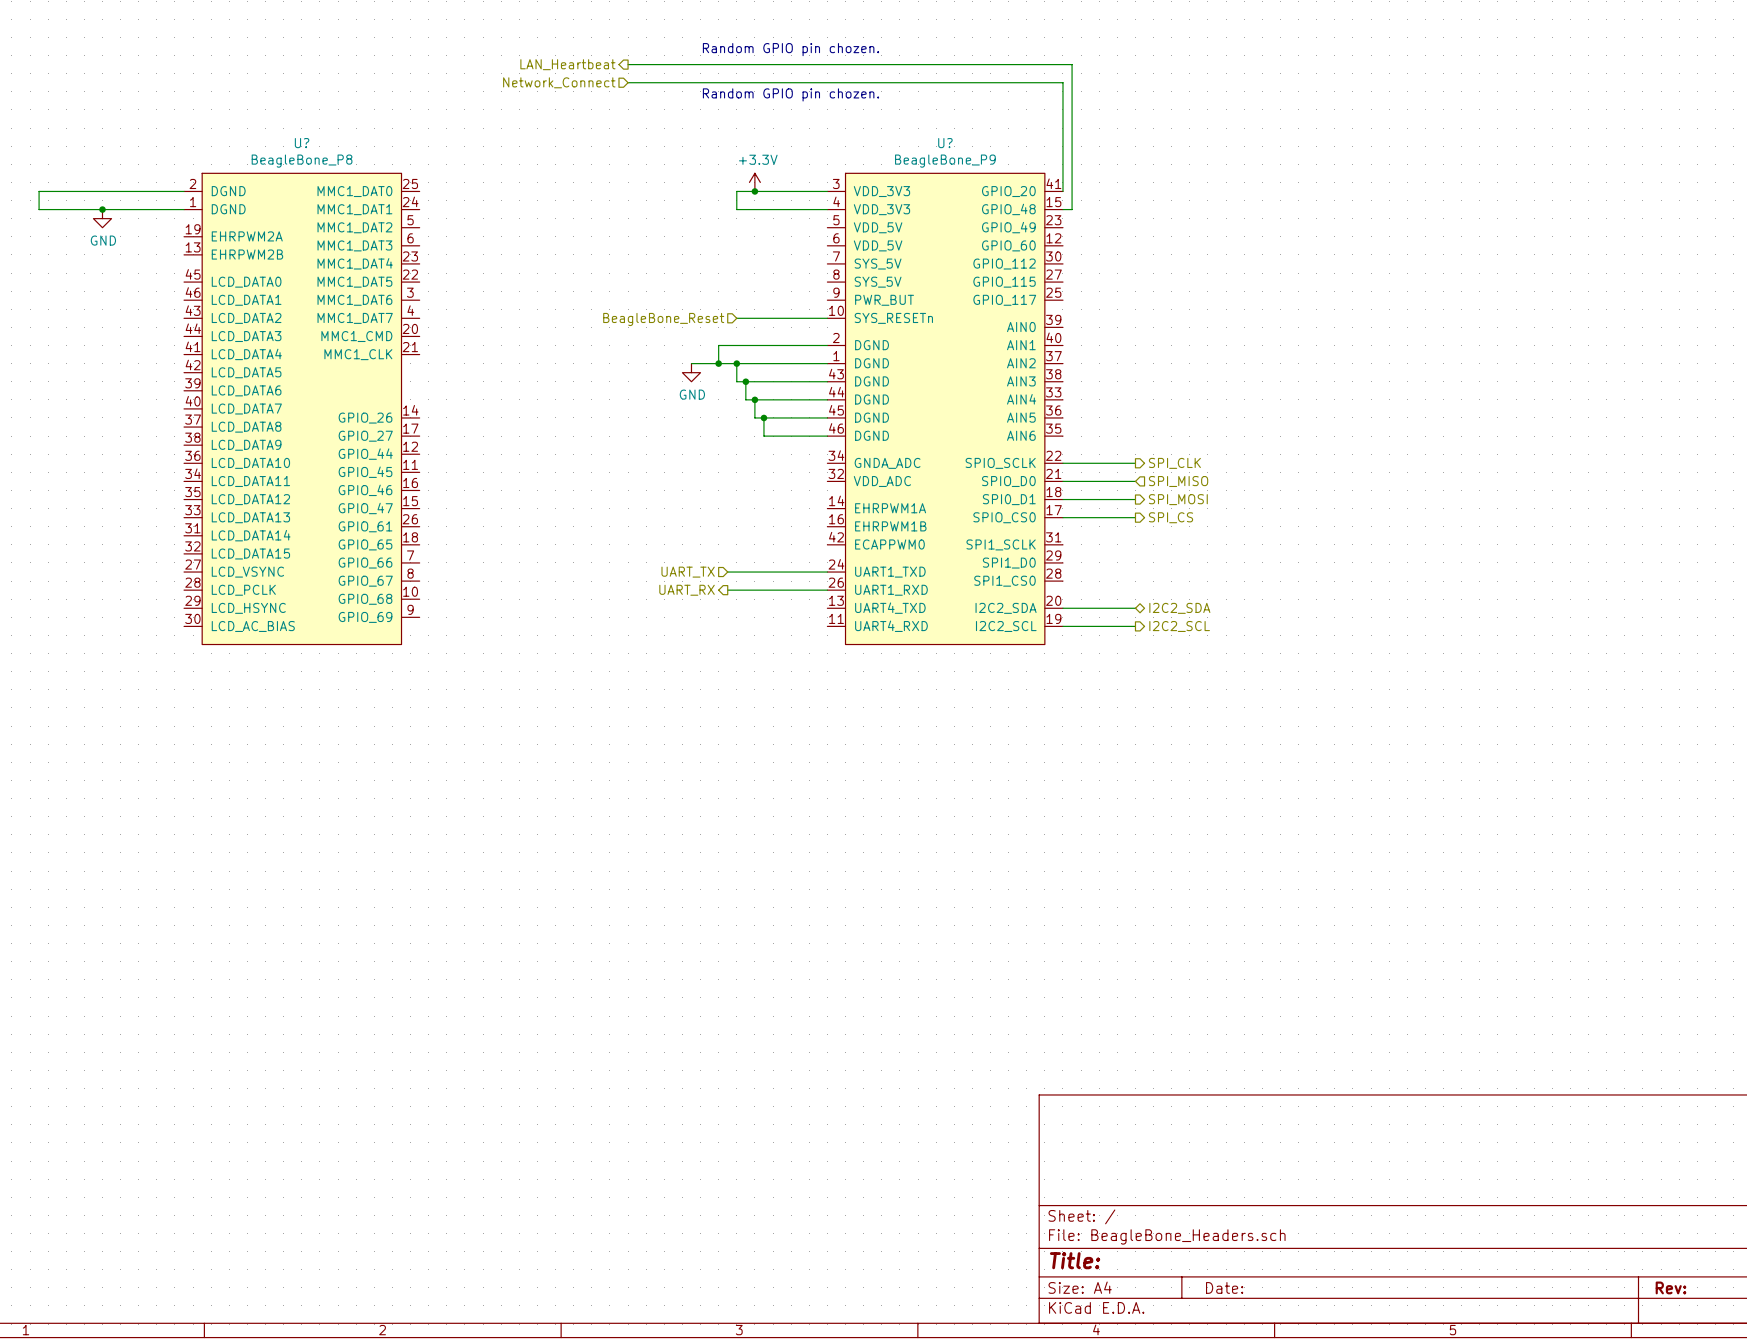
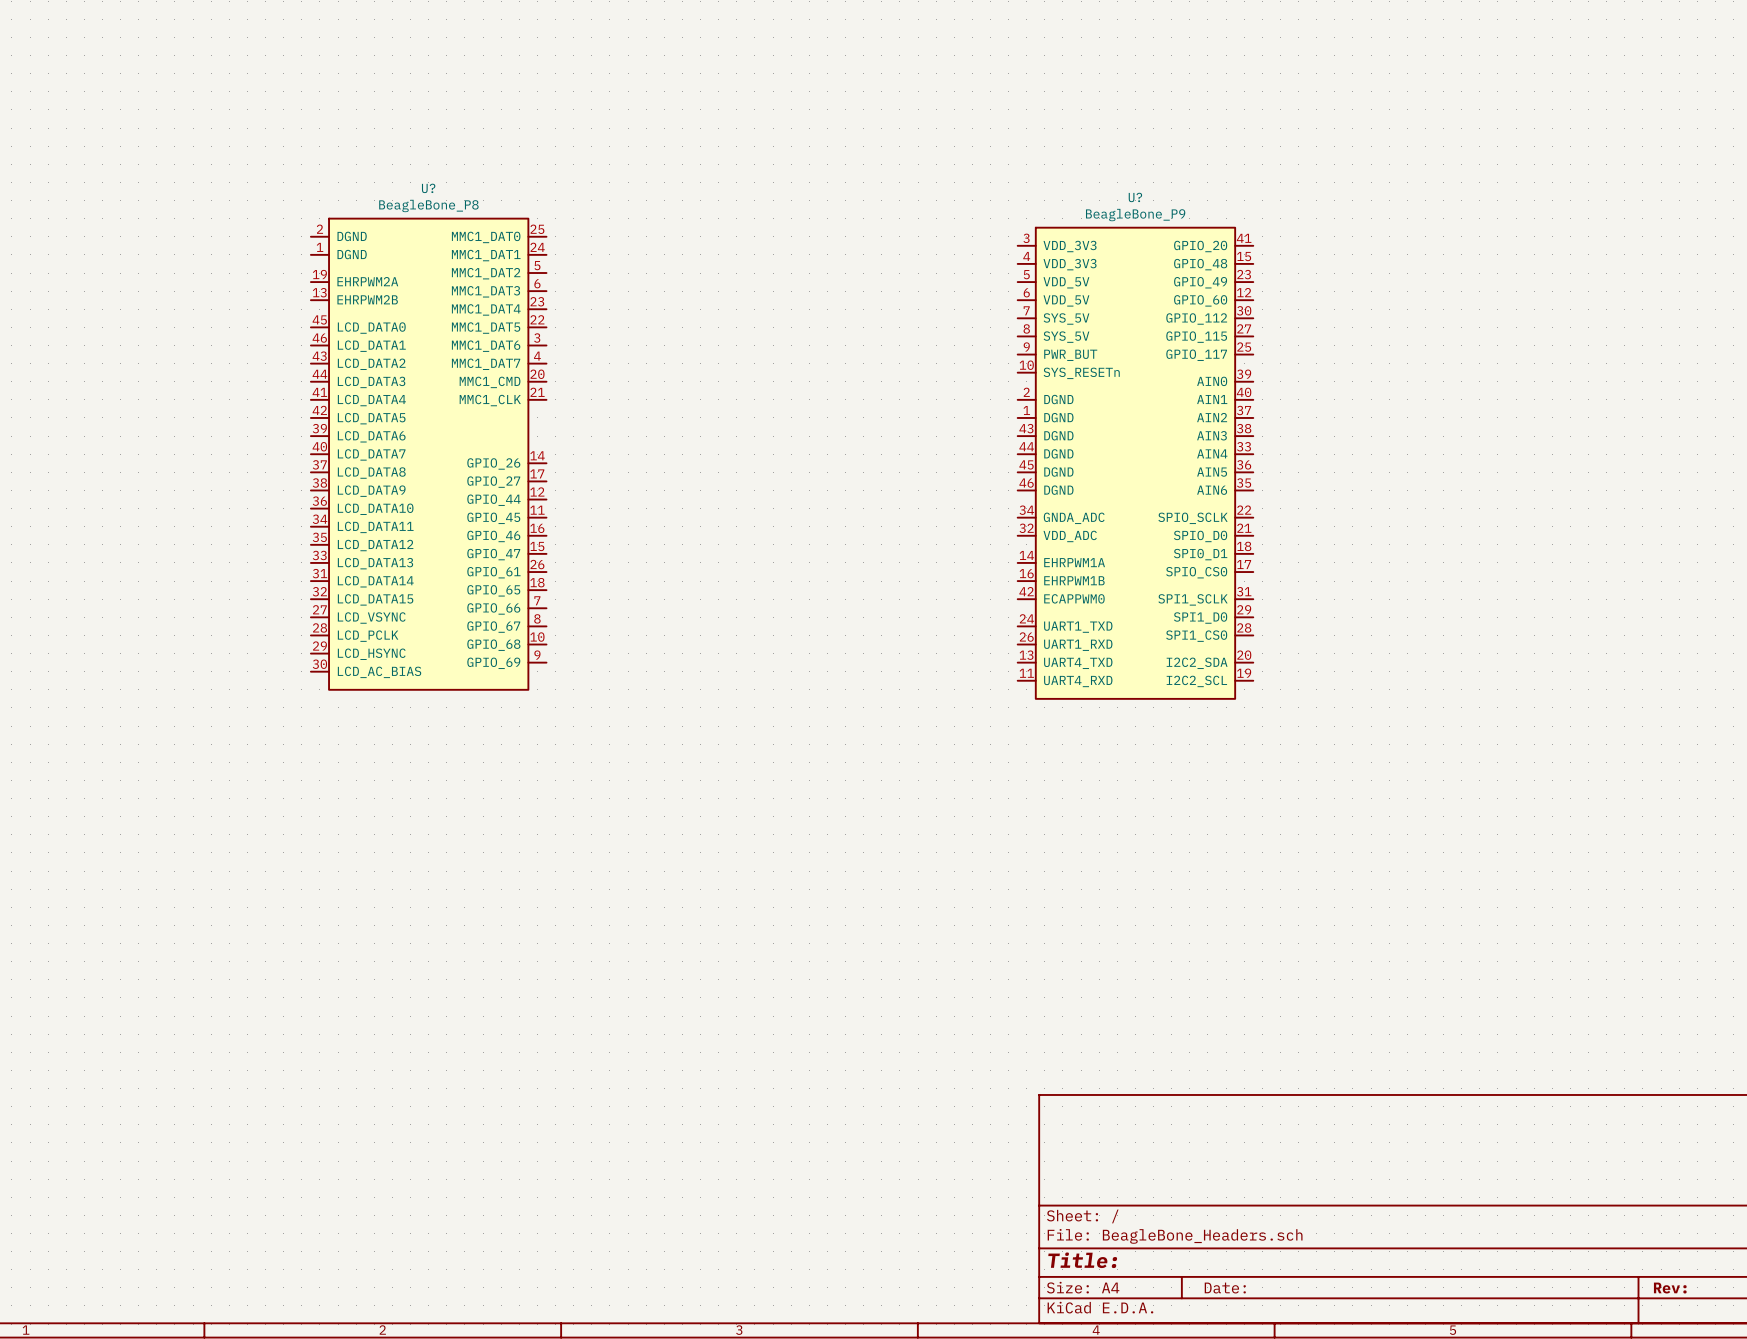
text: Random GPIO pin chozen. (791, 49) -> none
hierarchical label: LAN_Heartbeat (567, 64) -> none
wire: (628, 64) (1072, 64) (1072, 209) (1062, 209) -> none
hierarchical label: Network_Connect (559, 82) -> none
wire: (628, 82) (1062, 82) (1062, 191) -> none
text: Random GPIO pin chozen. (791, 94) -> none
power symbol: +3.3V (754, 182) -> none
wire: (184, 191) (39, 191) (39, 209) (184, 209) -> none
junction: (754, 191) -> none
wire: (827, 191) (736, 191) (736, 209) (827, 209) -> none
junction: (102, 209) -> none
power symbol: GND (102, 218) -> none
wire: (736, 318) (827, 318) -> none
hierarchical label: BeagleBone_Reset (663, 319) -> none
wire: (827, 345) (718, 345) (718, 363) -> none
wire: (691, 363) (827, 363) -> none
junction: (718, 363) -> none
wire: (736, 363) (736, 381) (827, 381) -> none
junction: (736, 363) -> none
power symbol: GND (691, 372) -> none
wire: (745, 381) (745, 399) (827, 399) -> none
junction: (745, 381) -> none
wire: (754, 399) (754, 417) (827, 417) -> none
junction: (754, 399) -> none
U? position: (301, 408) -> (428, 454)
U?: BeagleBone_P9 (945, 408) -> none
wire: (763, 417) (763, 436) (827, 436) -> none
junction: (763, 417) -> none
U?: none -> BeagleBone_P9 (1135, 463)
hierarchical label: SPI_CLK (1174, 463) -> none
hierarchical label: SPI_MISO (1178, 481) -> none
hierarchical label: SPI_MOSI (1178, 499) -> none
hierarchical label: SPI_CS (1171, 517) -> none
hierarchical label: UART_TX (688, 572) -> none
wire: (727, 572) (827, 572) -> none
hierarchical label: UART_RX (687, 590) -> none
wire: (727, 590) (827, 590) -> none
hierarchical label: I2C2_SDA (1179, 608) -> none
hierarchical label: I2C2_SCL (1179, 626) -> none

